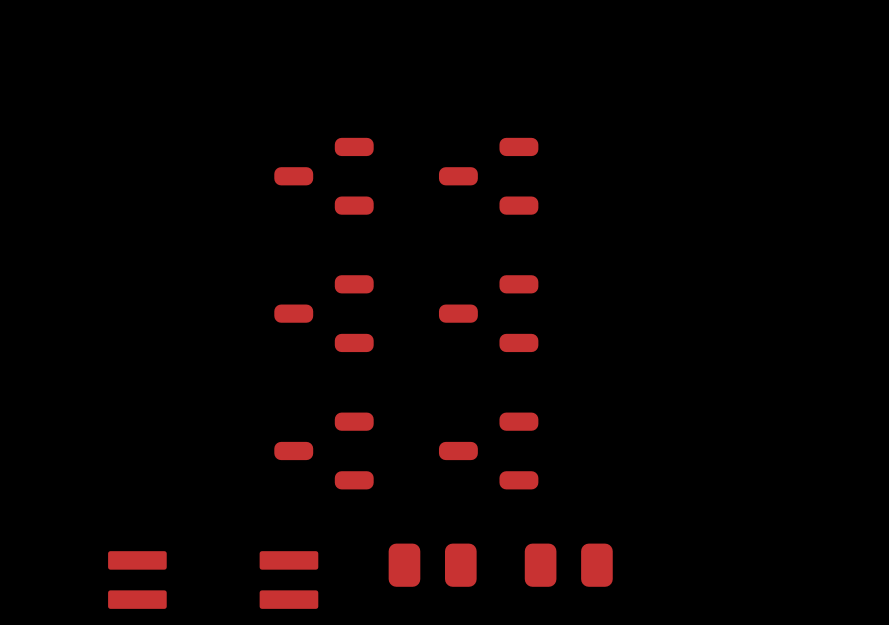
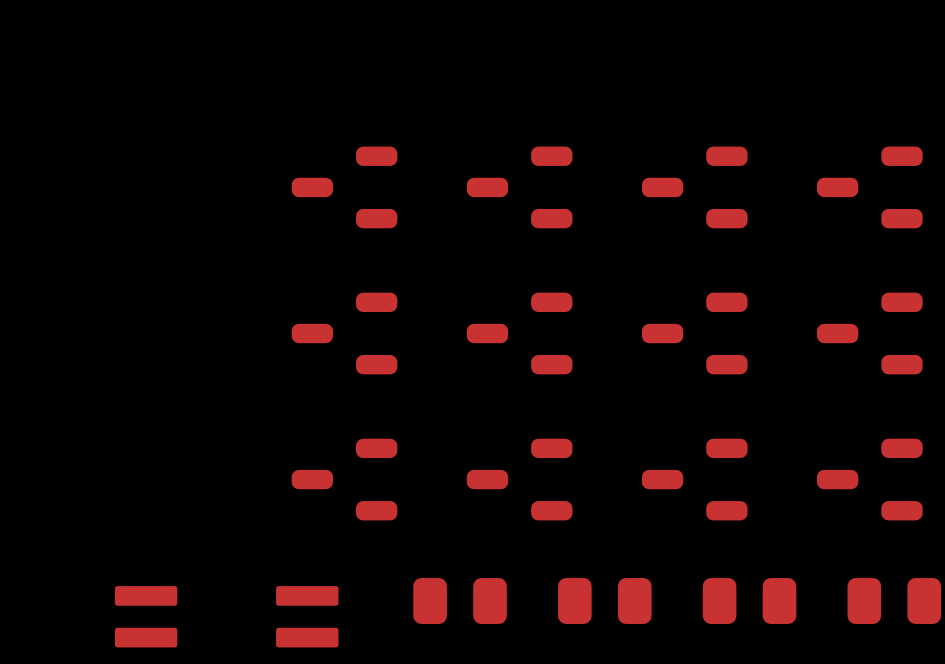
part: none -> (694, 187)
part: none -> (869, 187)
part: none -> (694, 333)
part: none -> (869, 333)
part: none -> (694, 479)
part: none -> (869, 479)
part: none -> (749, 601)
part: none -> (894, 601)

